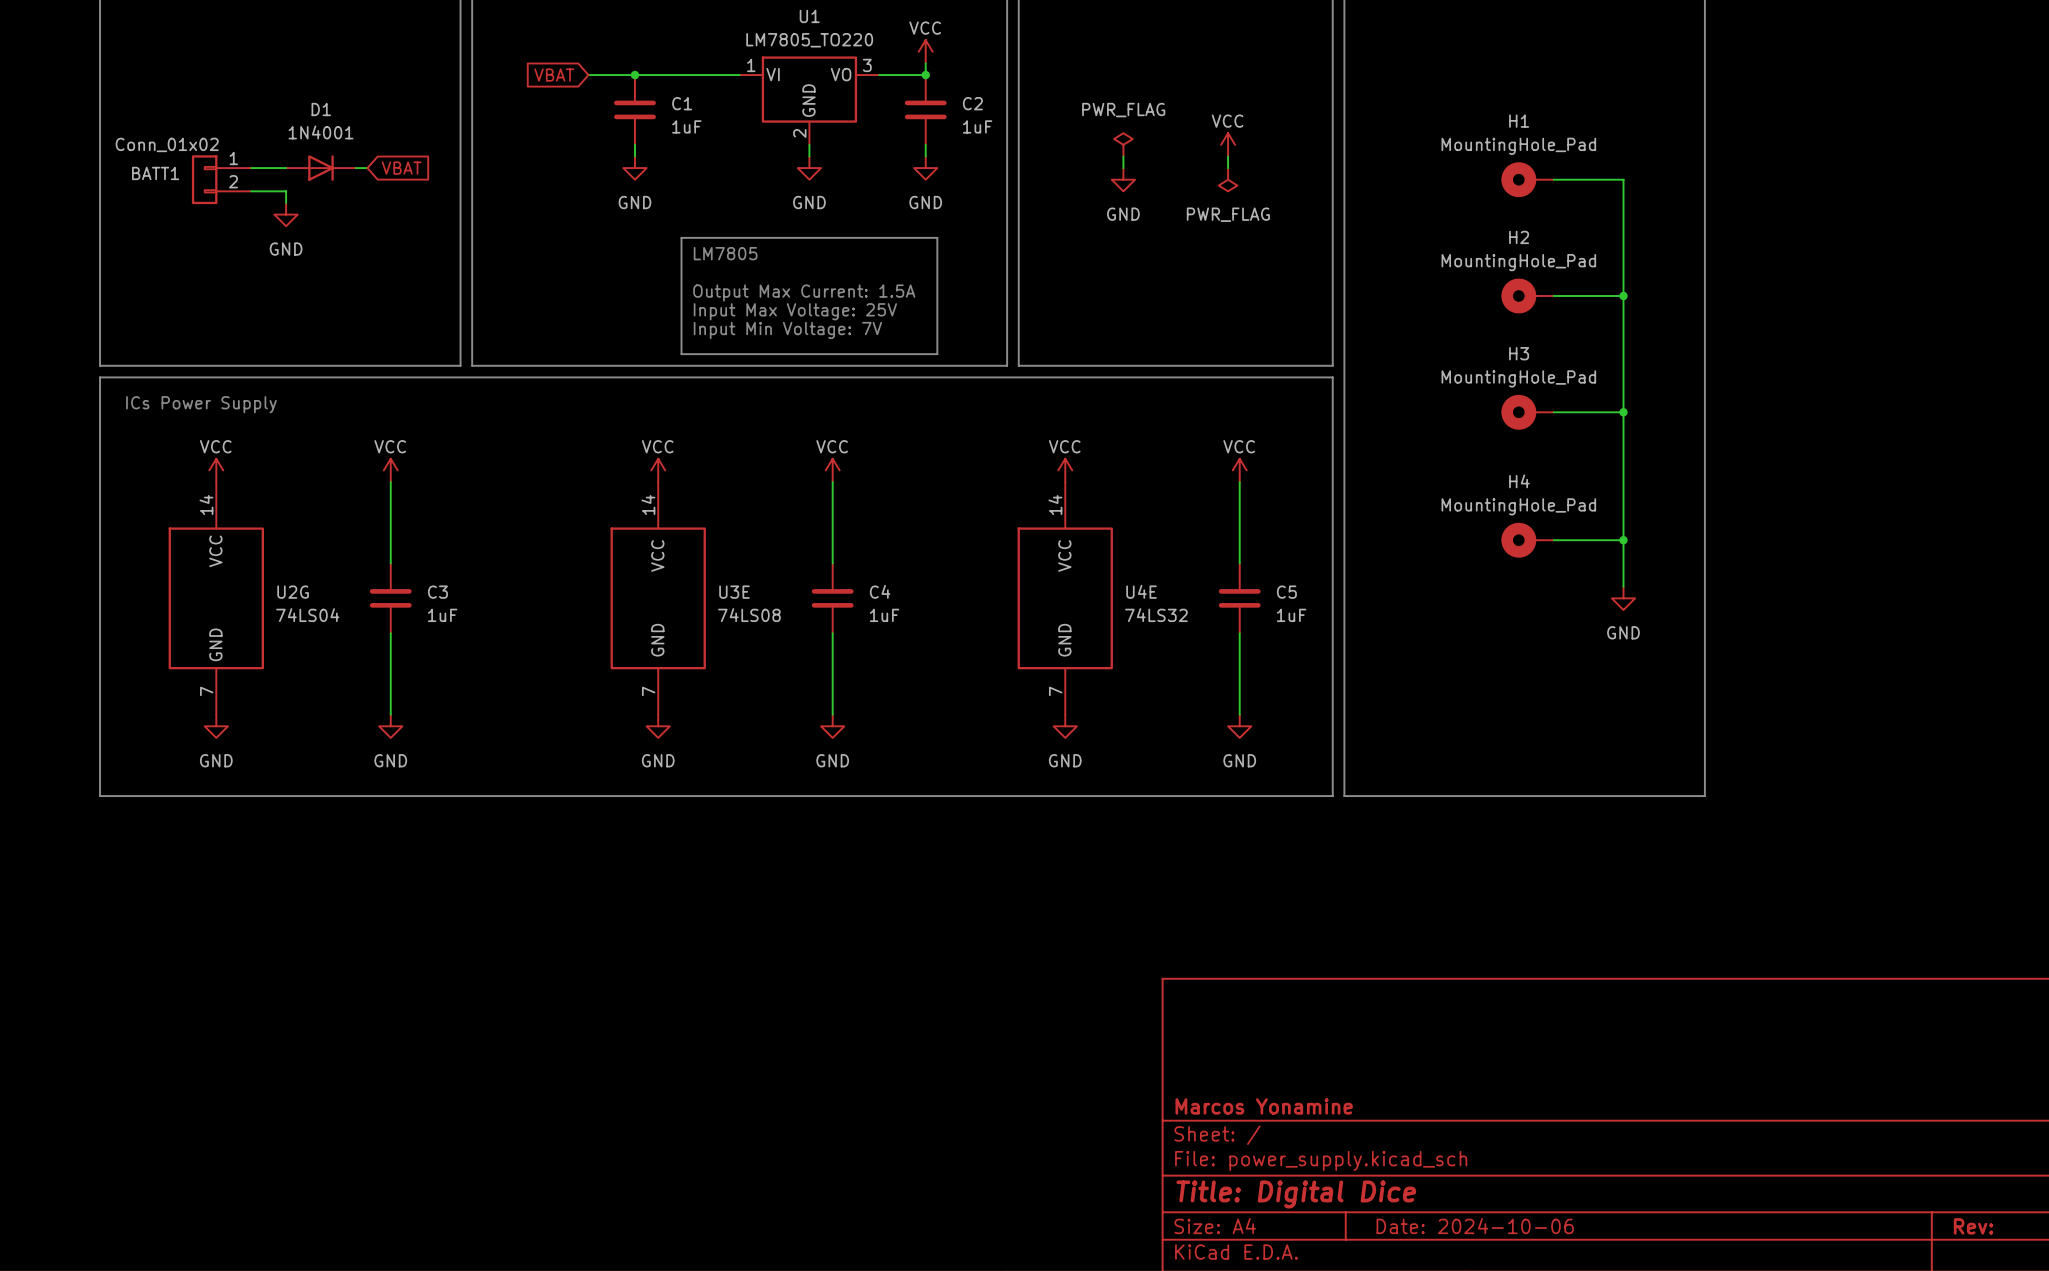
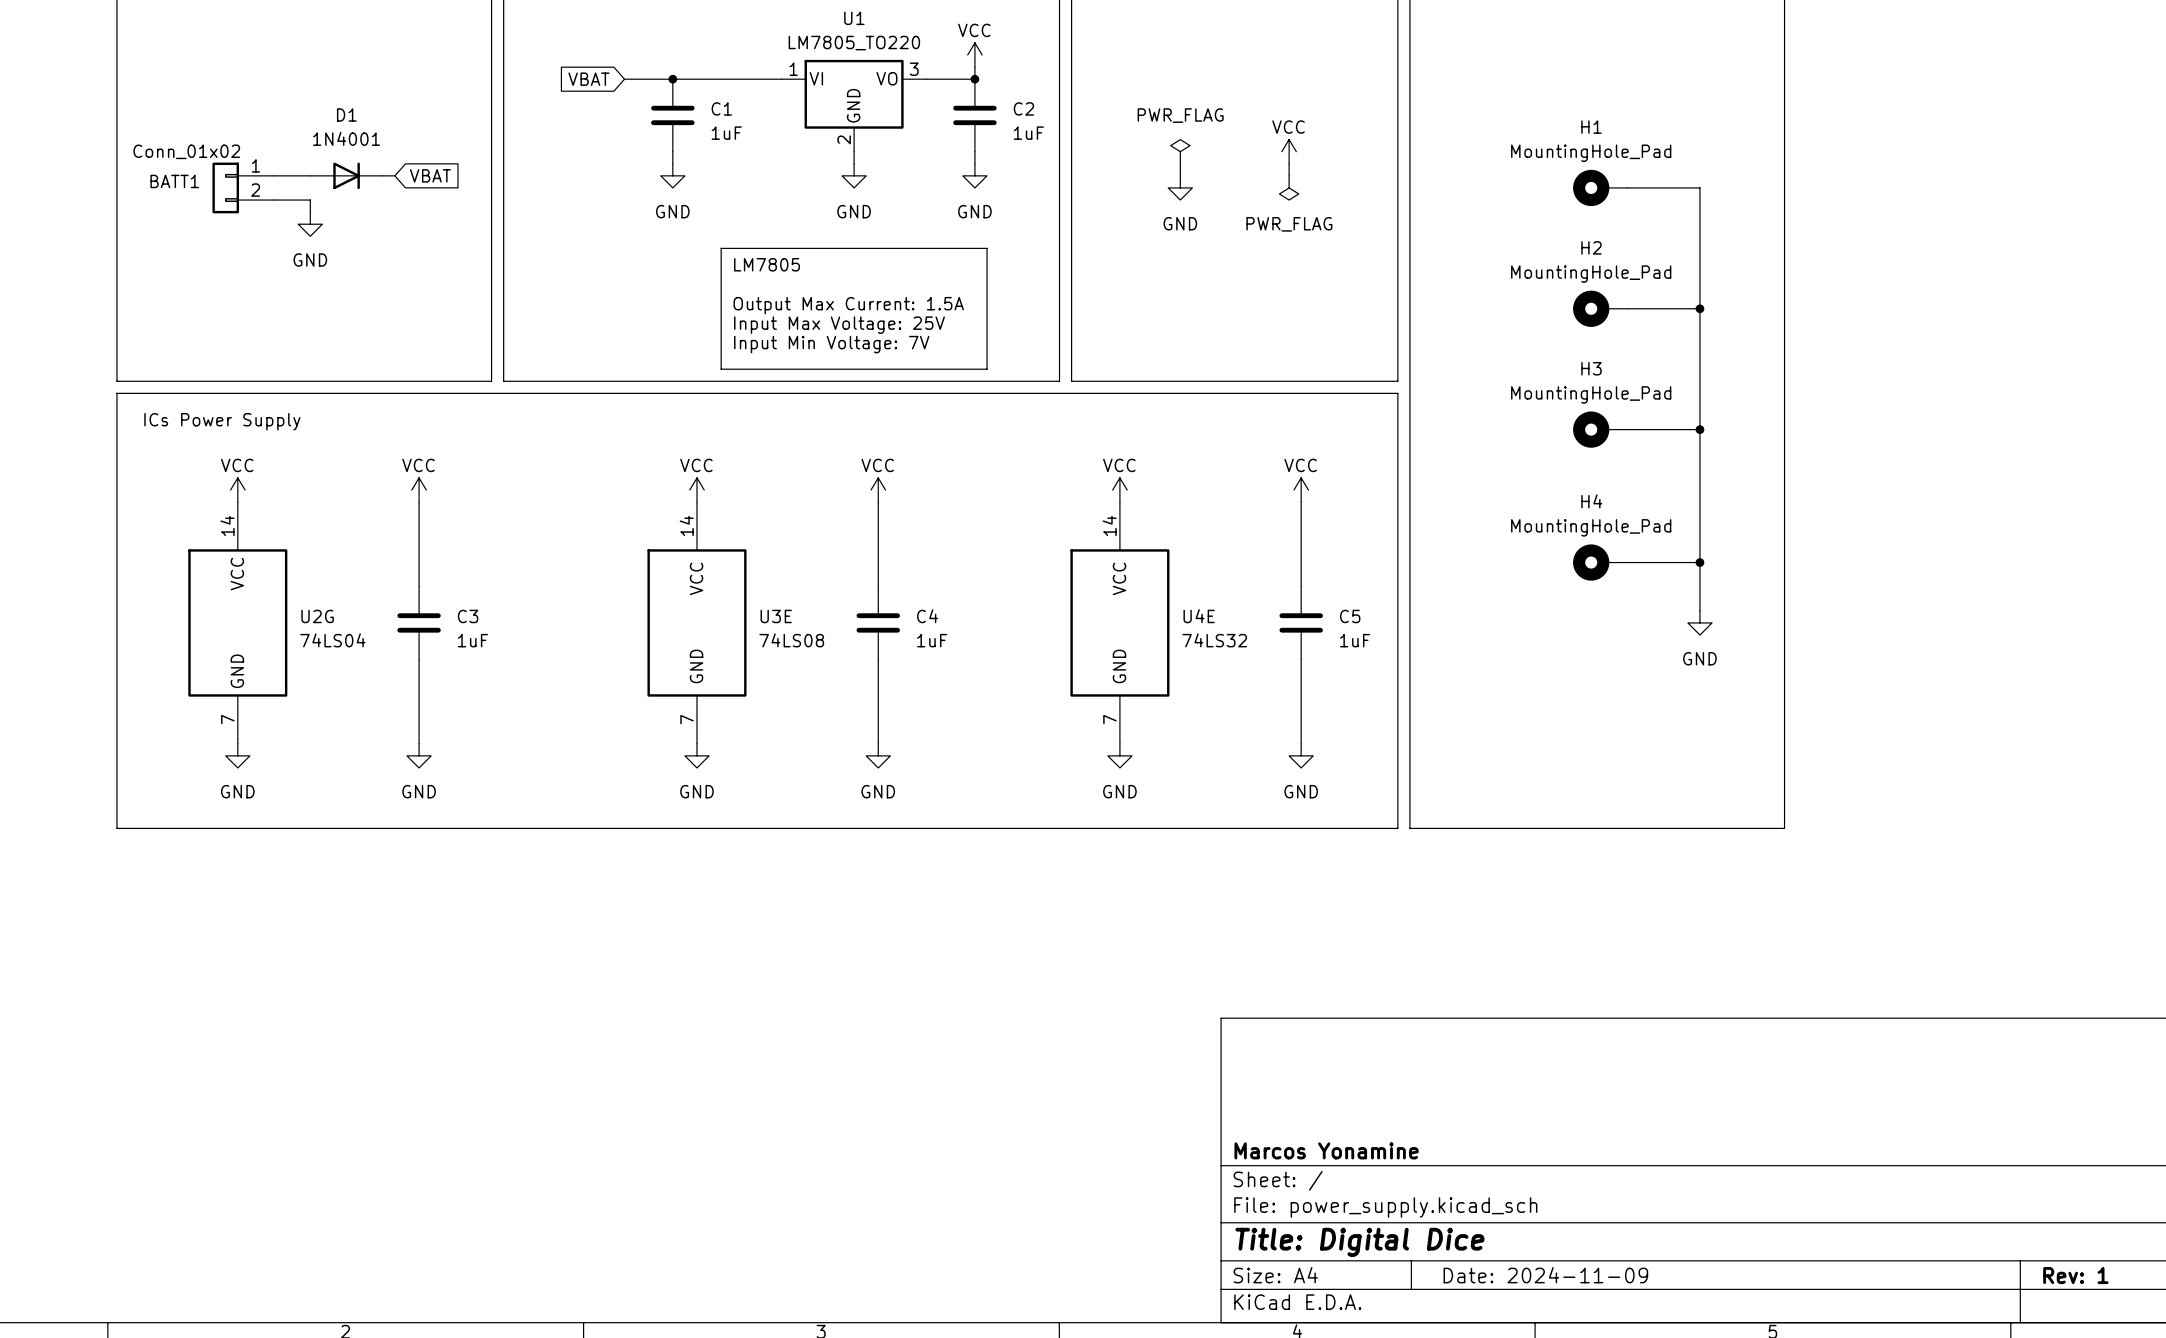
title block: Date: 2024-10-06 (1475, 1226) -> Date: 2024-11-09 (1545, 1275)
title block: Rev: (1973, 1226) -> Rev: 1 (2075, 1275)

